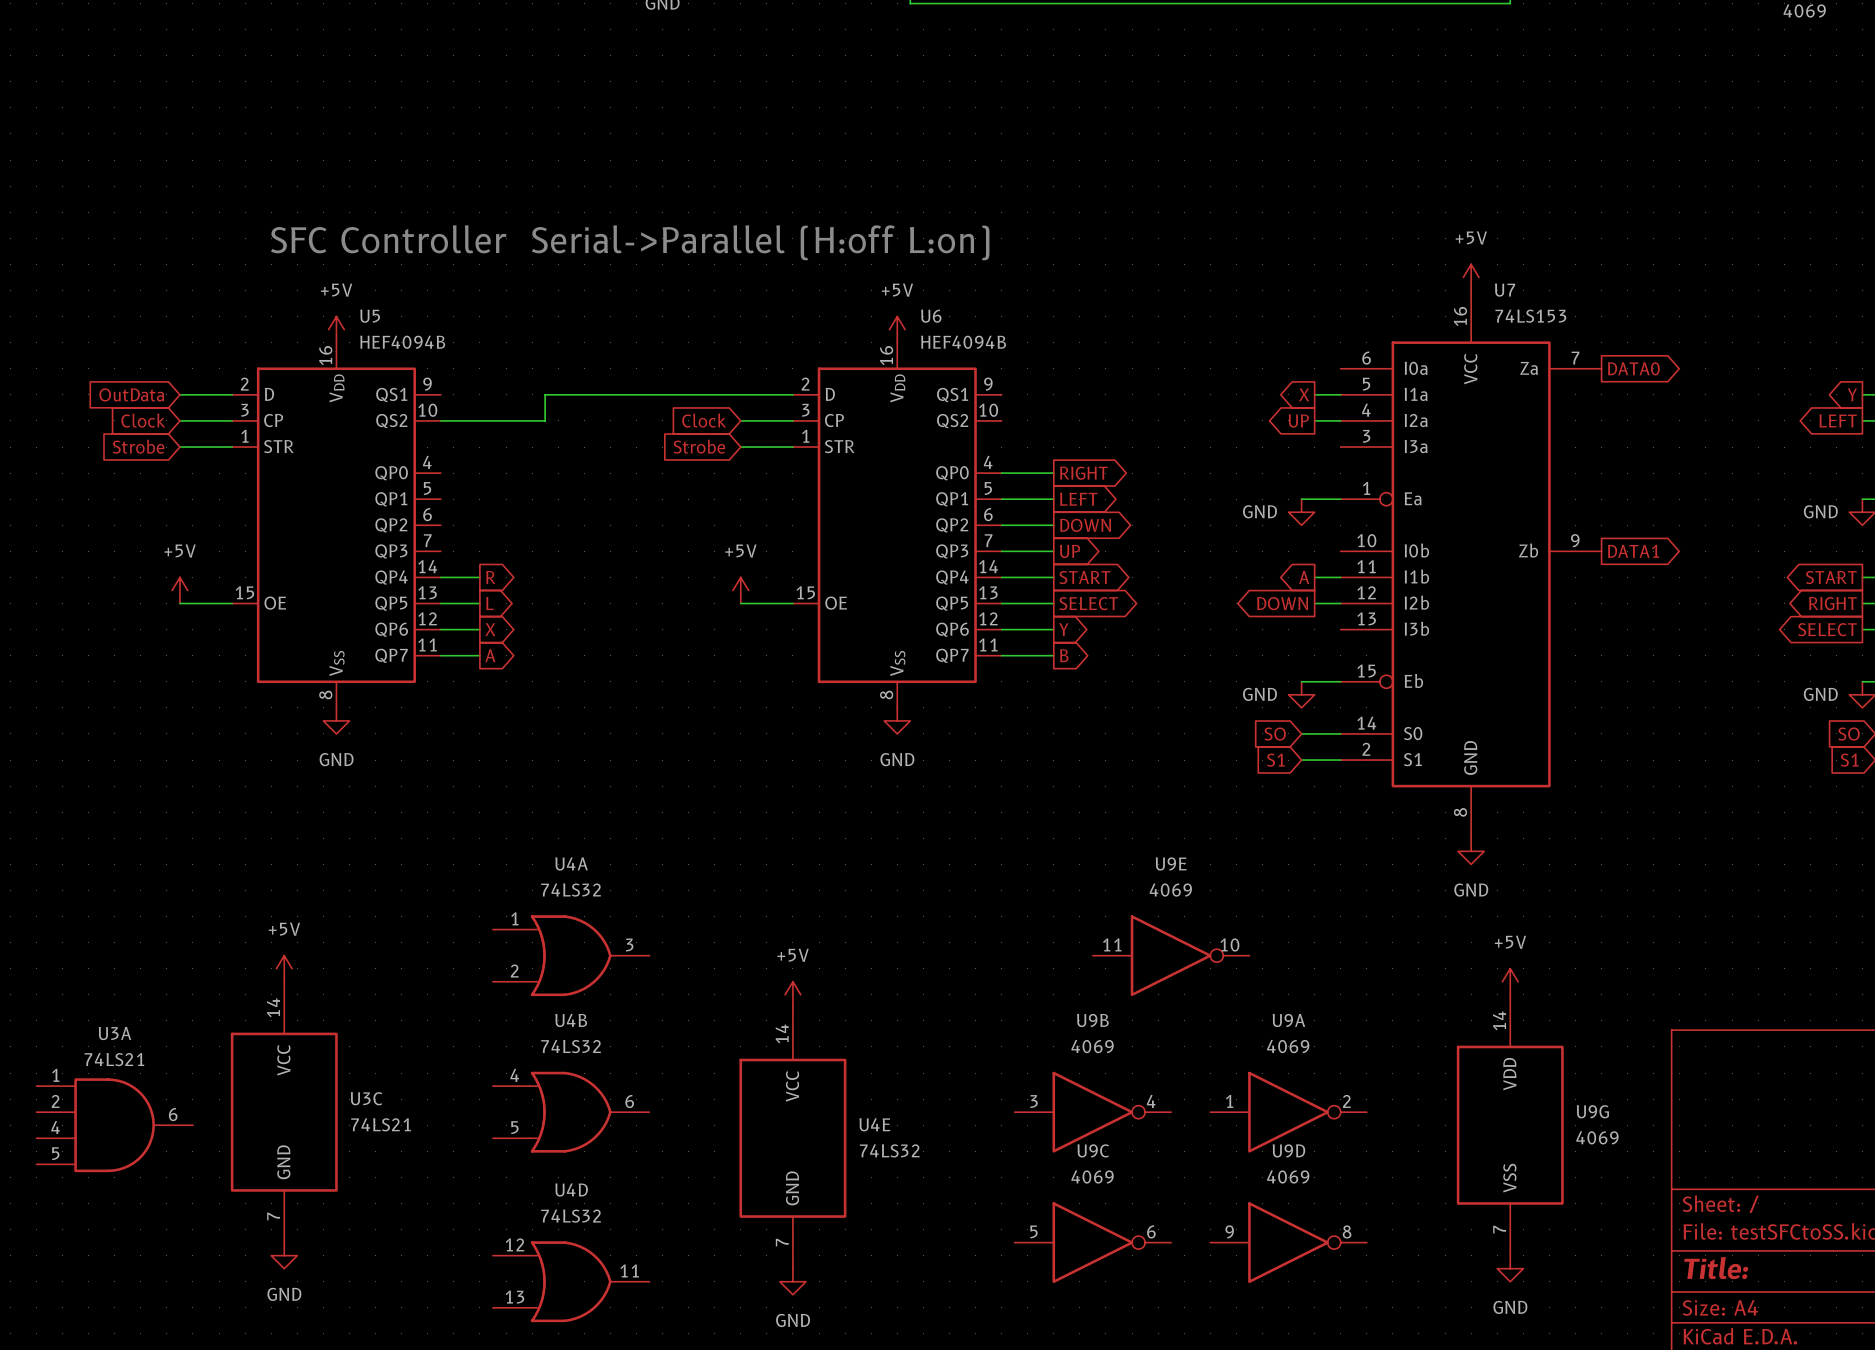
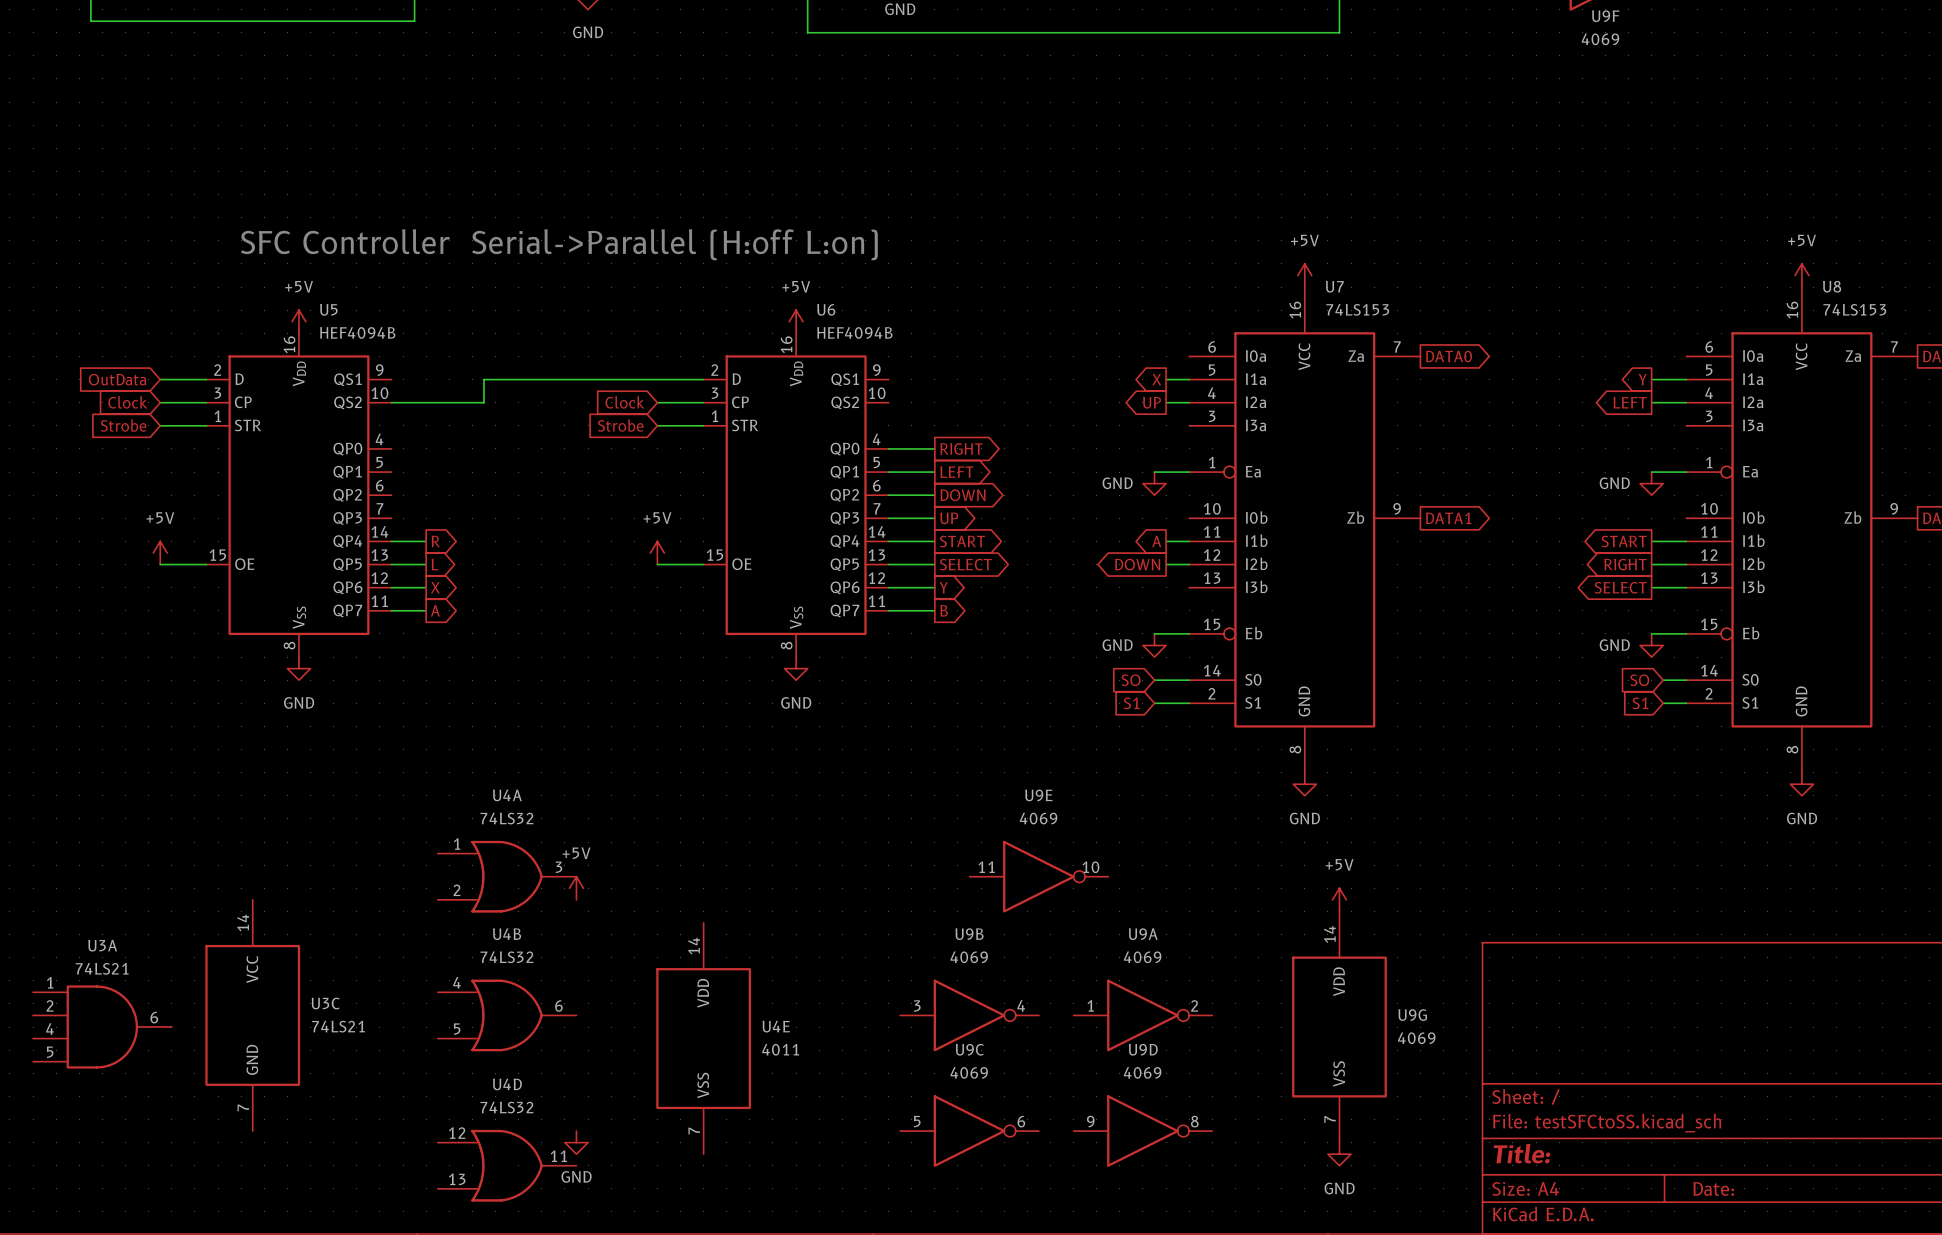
power symbol: +5V (284, 968) -> none
power symbol position: +5V (792, 994) -> +5V (576, 888)
U4E pin name: VCC (792, 1086) -> VDD (703, 993)
U4E value: 74LS32 (889, 1150) -> 4011 (780, 1049)
U4E pin name: GND (792, 1188) -> VSS (703, 1085)
power symbol: GND (284, 1255) -> none
power symbol position: GND (792, 1281) -> GND (576, 1142)

